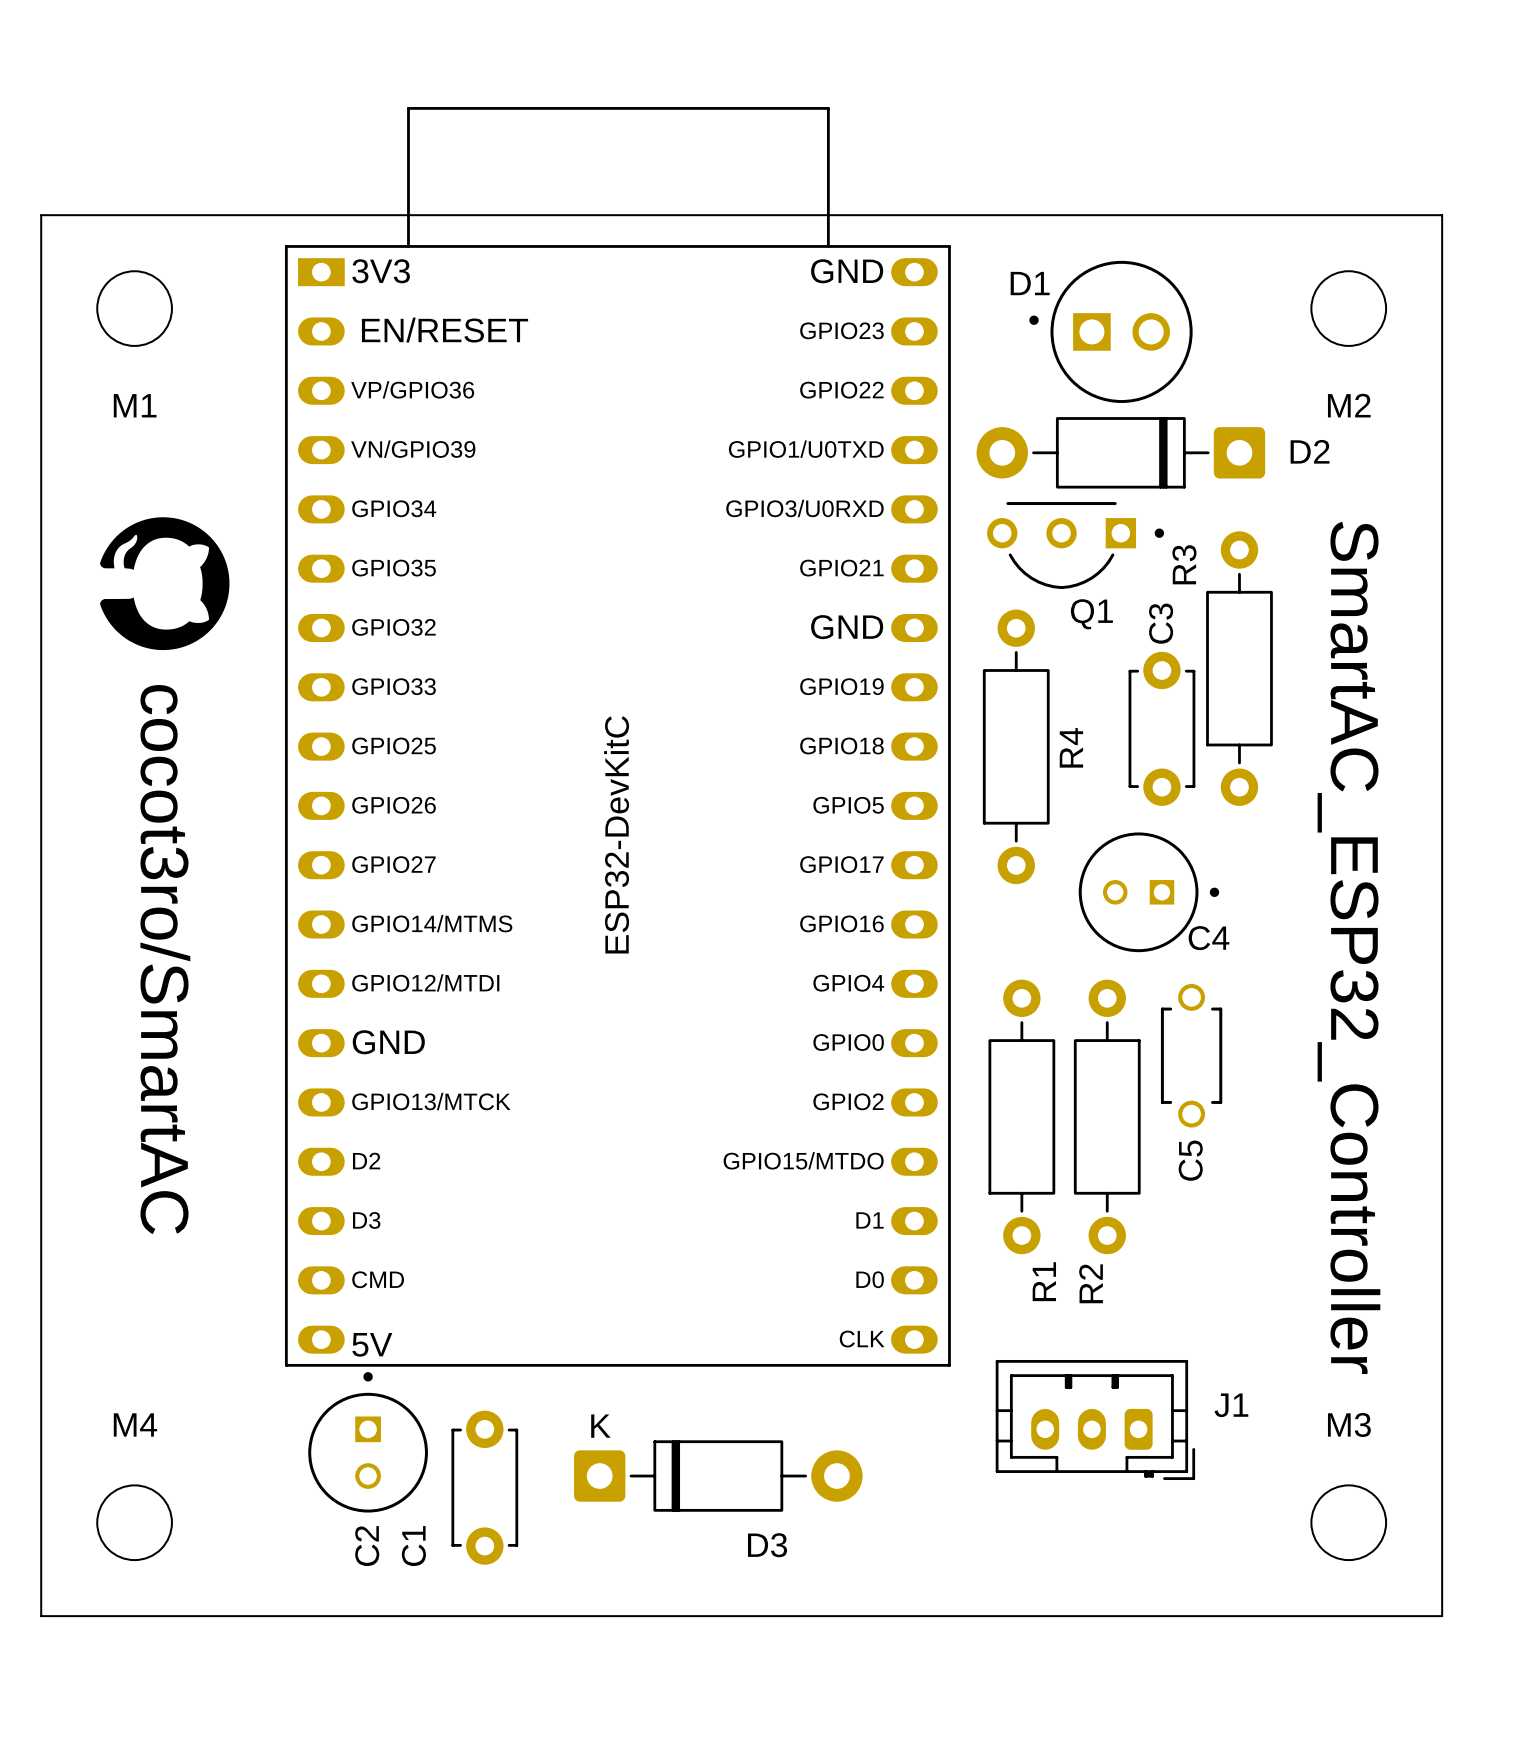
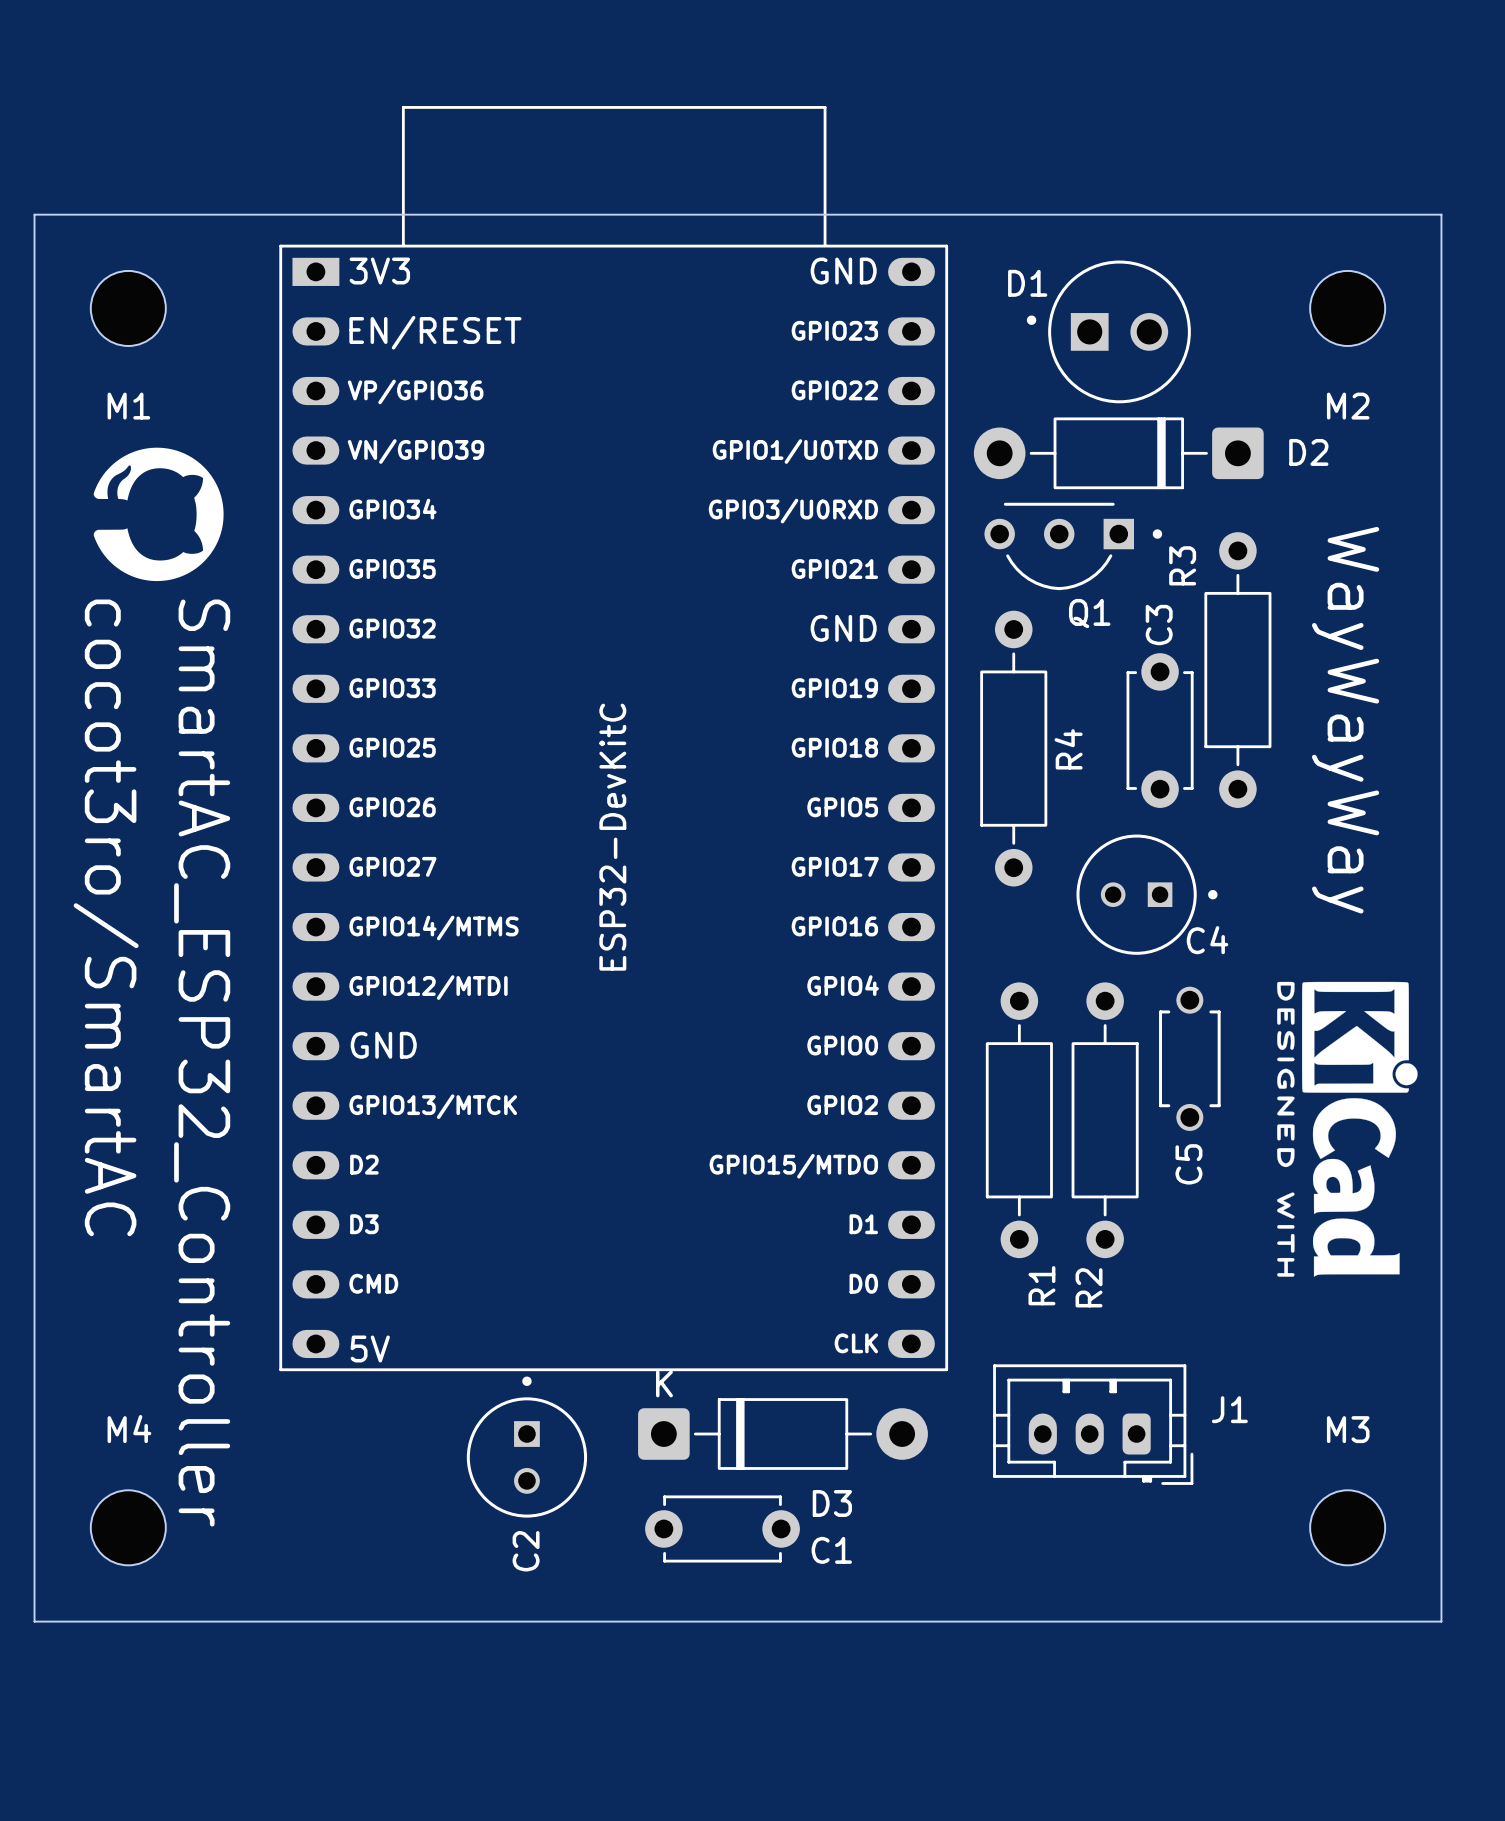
drawing position: (164, 583) -> (158, 514)
text: SmartAC_ESP32_Controller (1348, 947) -> WayWayWay (1345, 720)
text position: cocot3ro/SmartAC (165, 959) -> cocot3ro/SmartAC (106, 917)
drawing: none -> [1277, 981, 1418, 1277]
text: none -> SmartAC_ESP32_Controller (202, 1063)
C2 position: (368, 1442) -> (526, 1447)
D3 position: (718, 1476) -> (783, 1434)
C1 rotation: 0° (484, 1487) -> 90° clockwise (722, 1528)
C1 position: (484, 1487) -> (722, 1528)
C1 name position: C1 (413, 1546) -> C1 (831, 1550)

